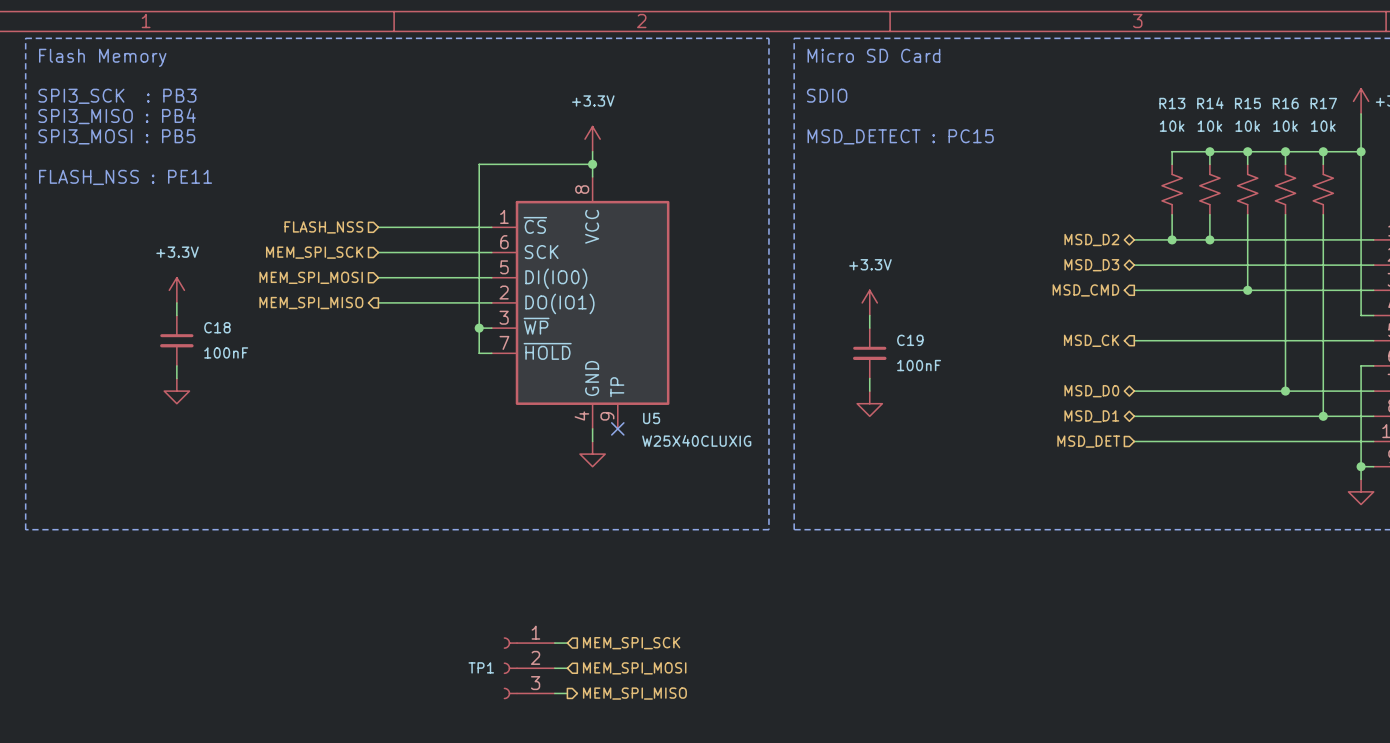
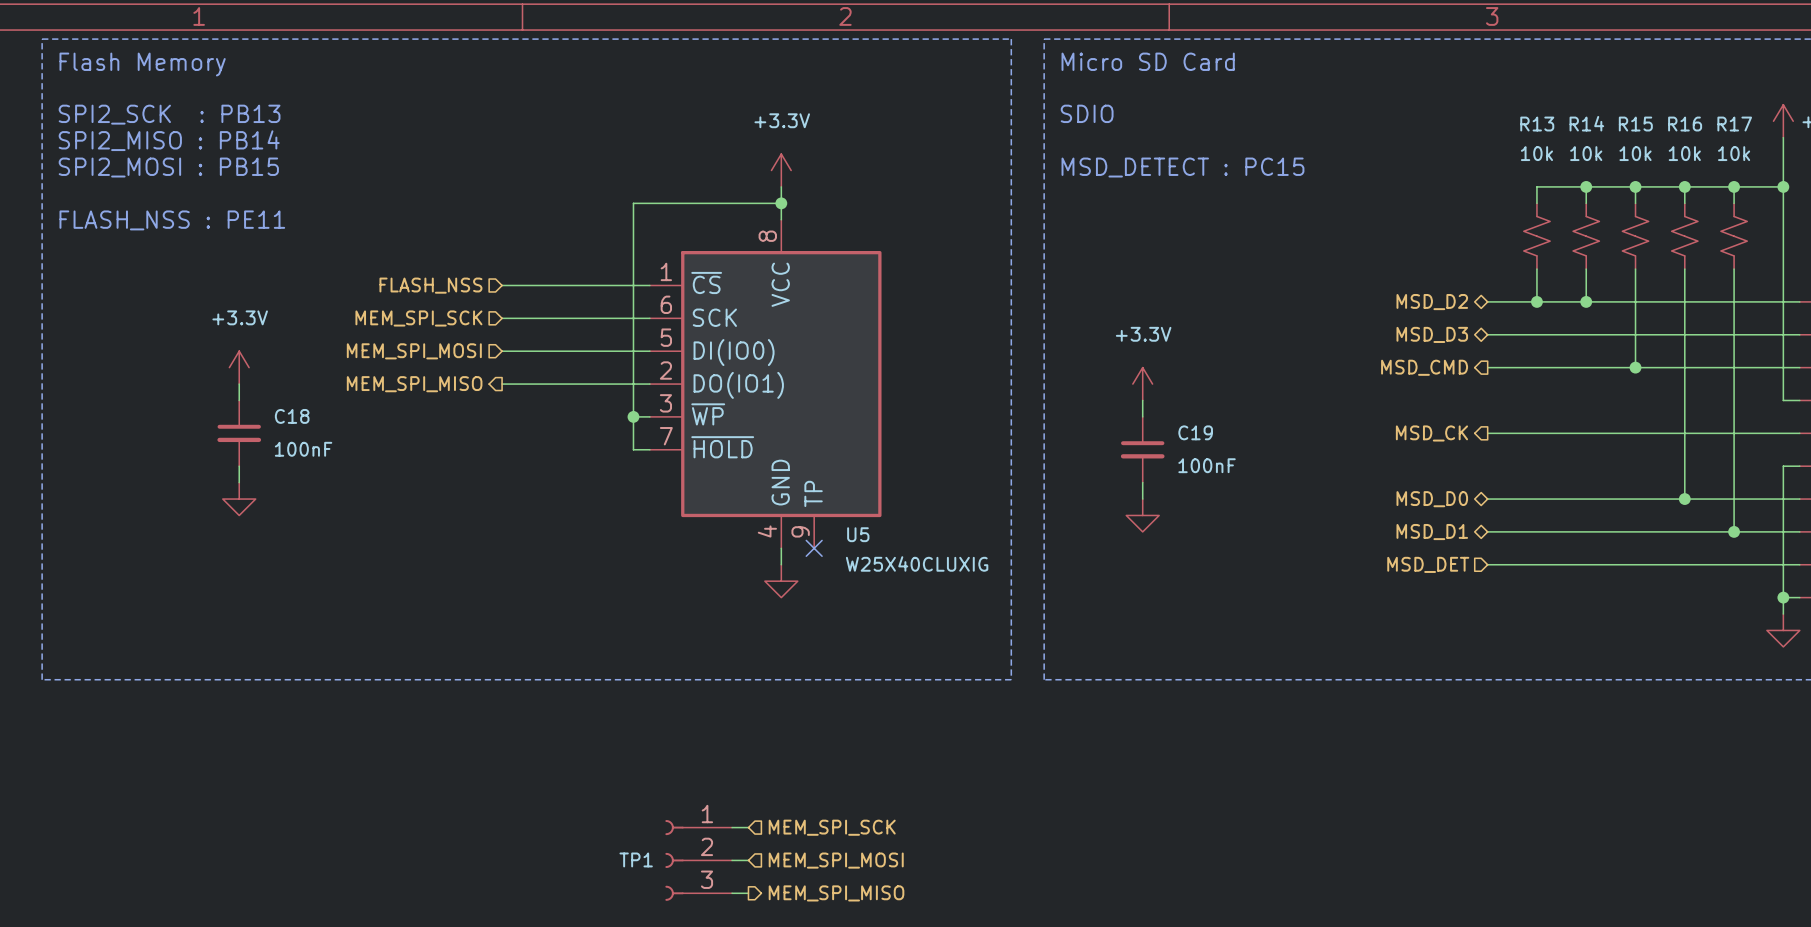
text: SPI3_SCK : PB3 (117, 96) -> SPI2_SCK : PB13 (169, 114)
text: SPI3_MISO : PB4 (117, 116) -> SPI2_MISO : PB14 (169, 140)
text: SPI3_MOSI : PB5 (116, 136) -> SPI2_MOSI : PB15 (168, 167)

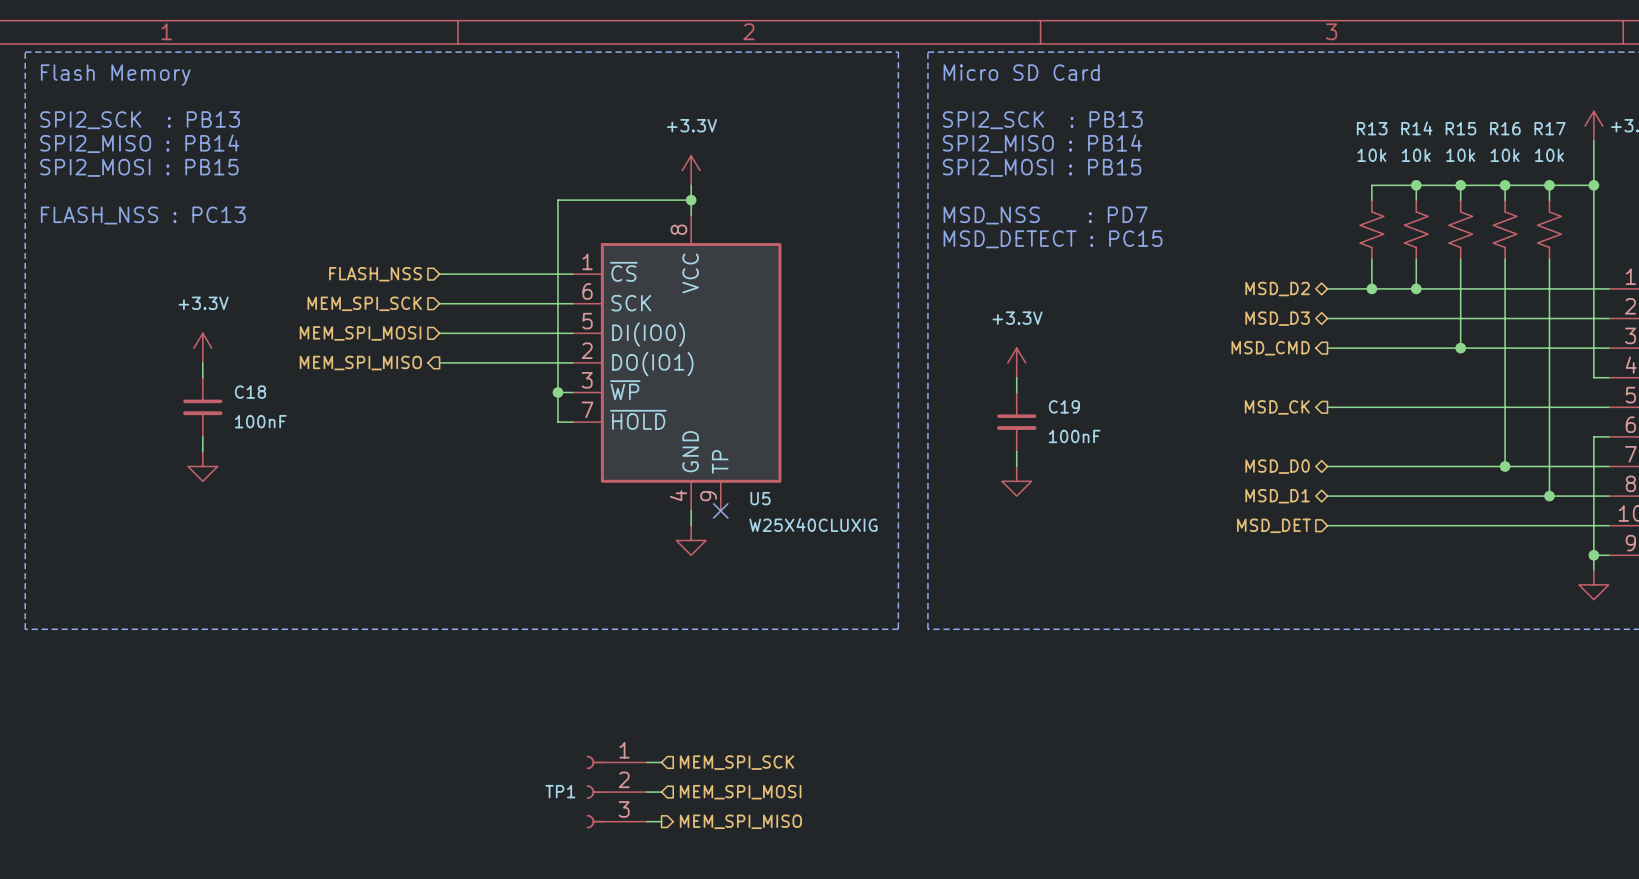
text: SDIO (1087, 113) -> SPI2_SCK : PB13 (1042, 120)
text: none -> SPI2_MISO : PB14 (1042, 143)
text: MSD_DETECT : PC15 (1182, 167) -> SPI2_MOSI : PB15 (1042, 167)
text: FLASH_NSS : PE11 (172, 220) -> FLASH_NSS : PC13 (143, 215)
text: none -> MSD_NSS : PD7 (1045, 215)
text: none -> MSD_DETECT : PC15 (1052, 239)

